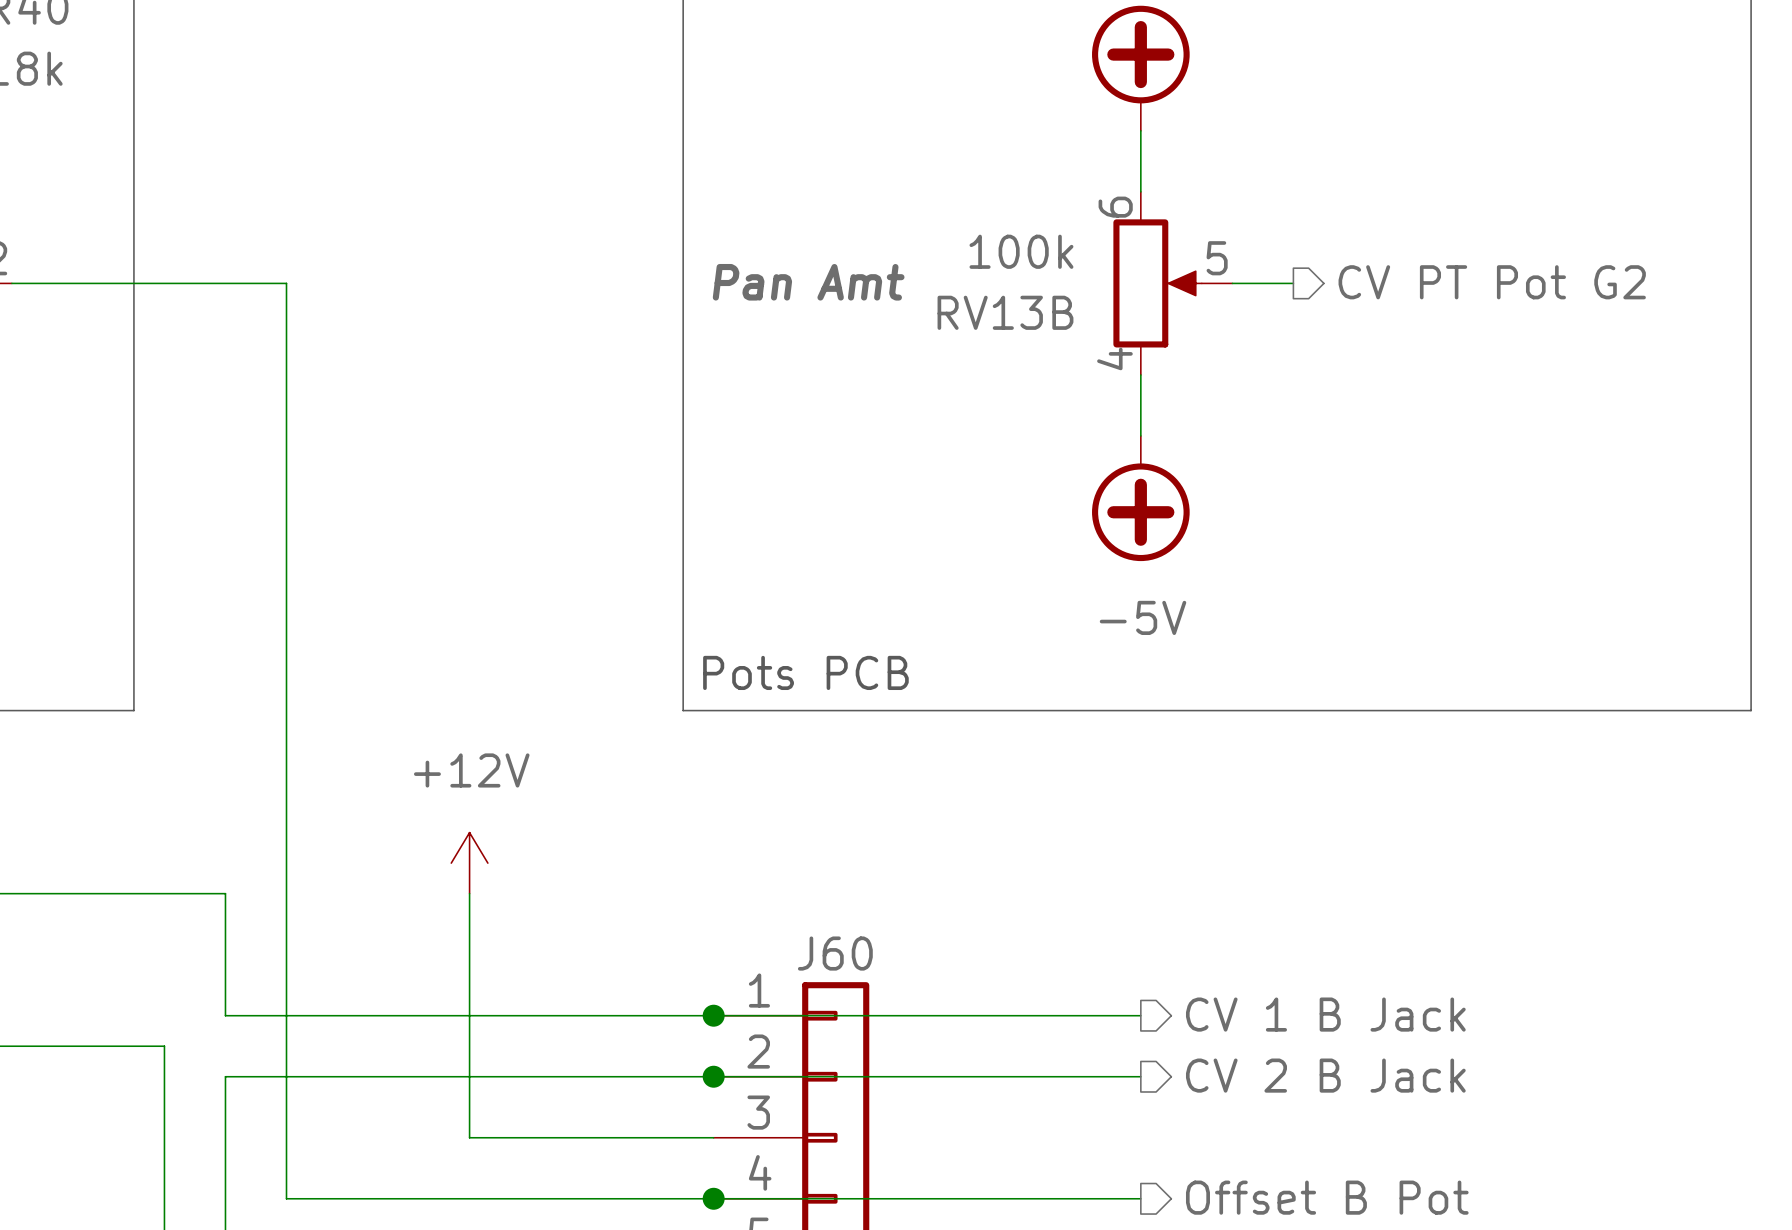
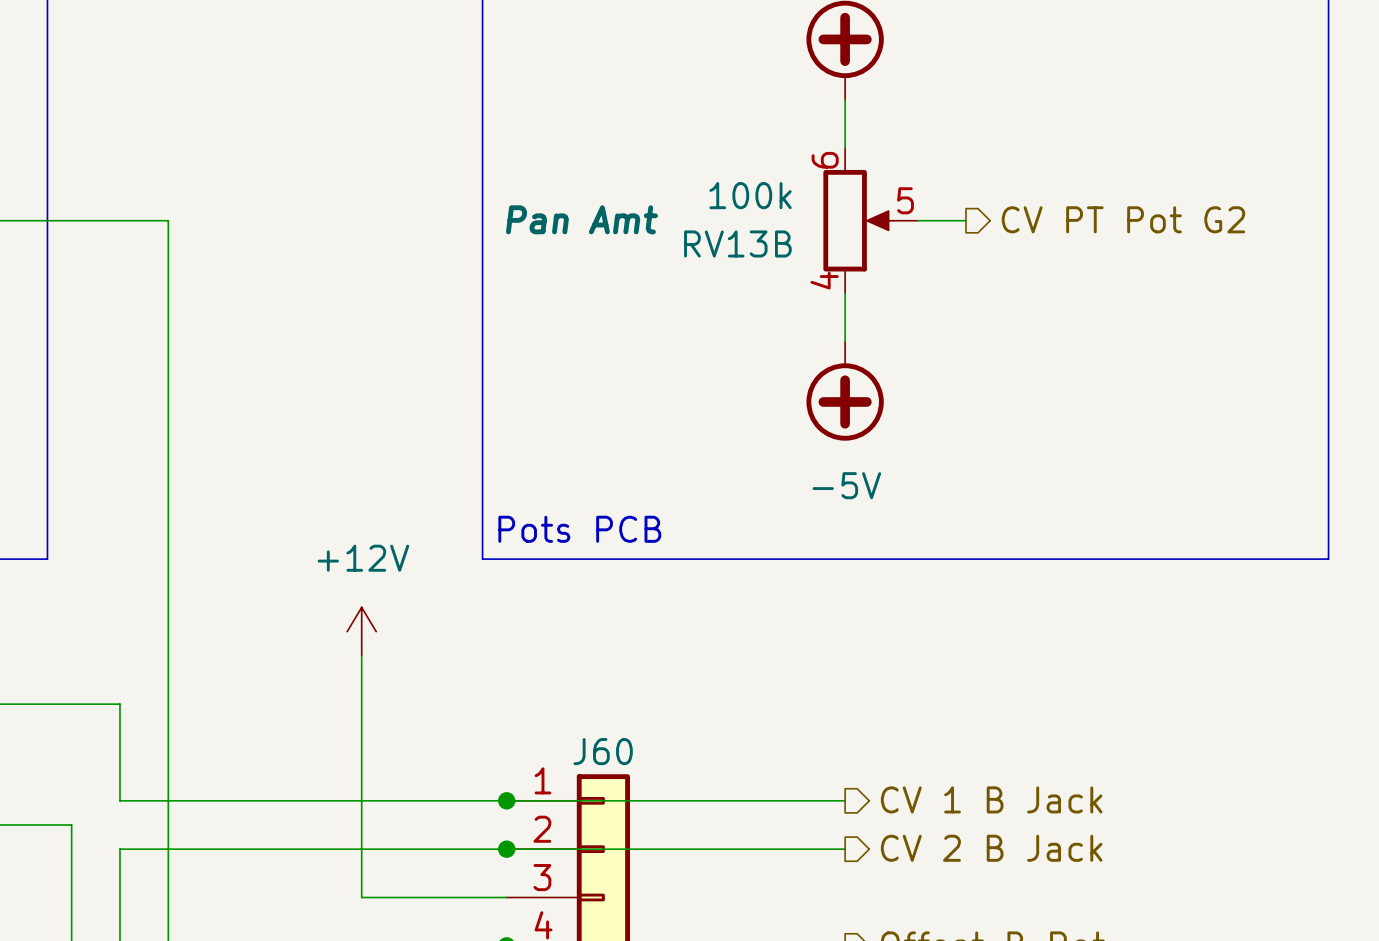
power symbol position: +12V (469, 863) -> +12V (361, 631)
wire: (469, 893) (469, 1137) (530, 1137) -> (361, 655) (361, 897)

